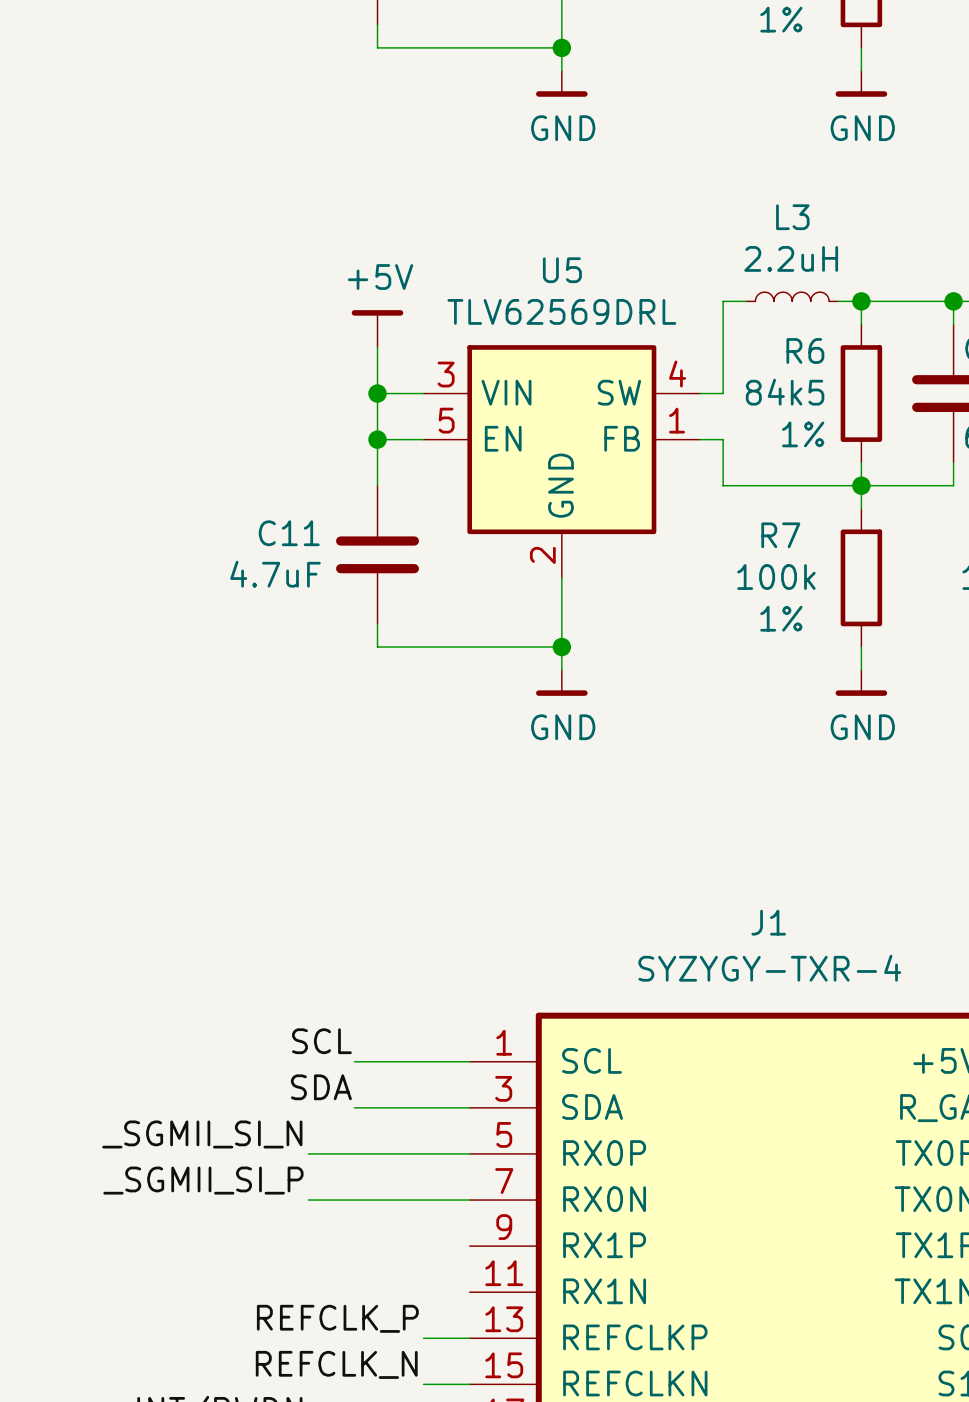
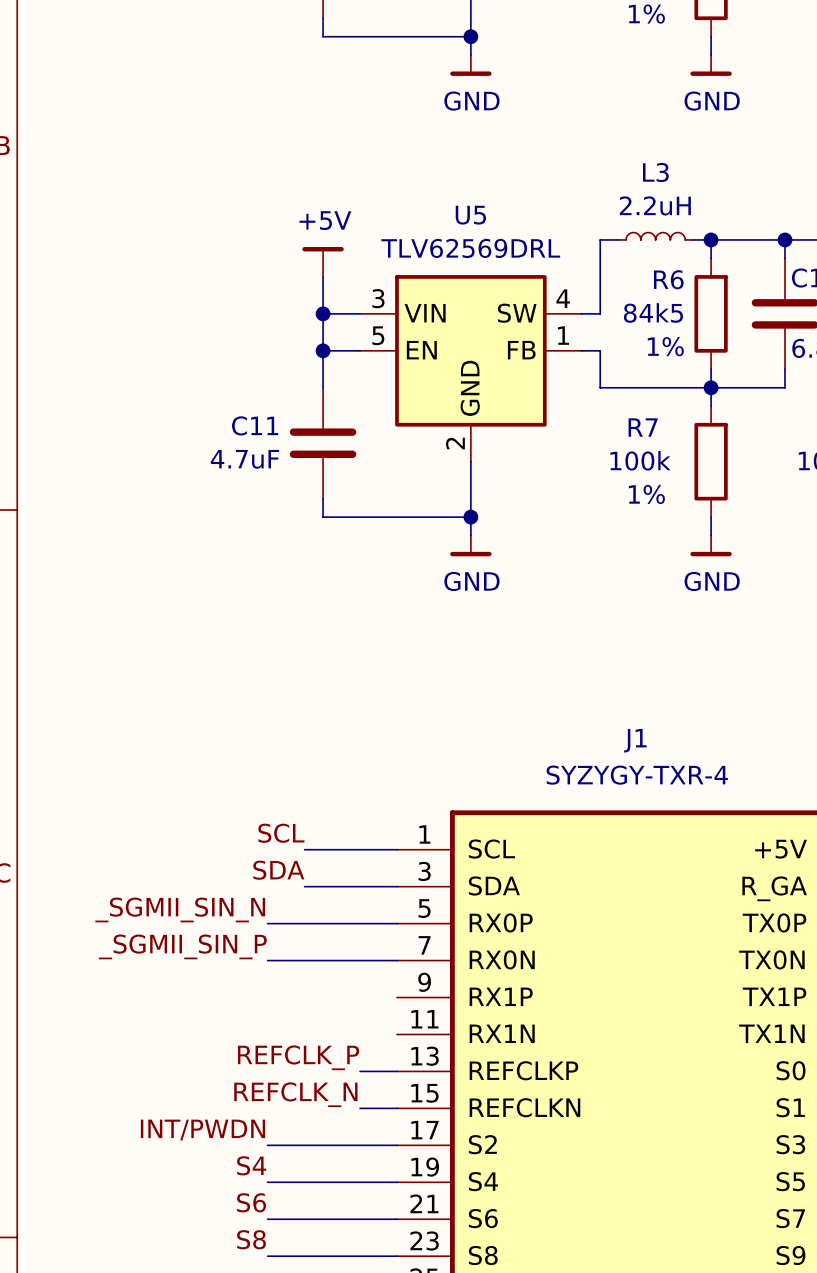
label: _SGMII_SI_N (202, 1134) -> _SGMII_SIN_N (180, 909)
label: _SGMII_SI_P (203, 1180) -> _SGMII_SIN_P (182, 946)

